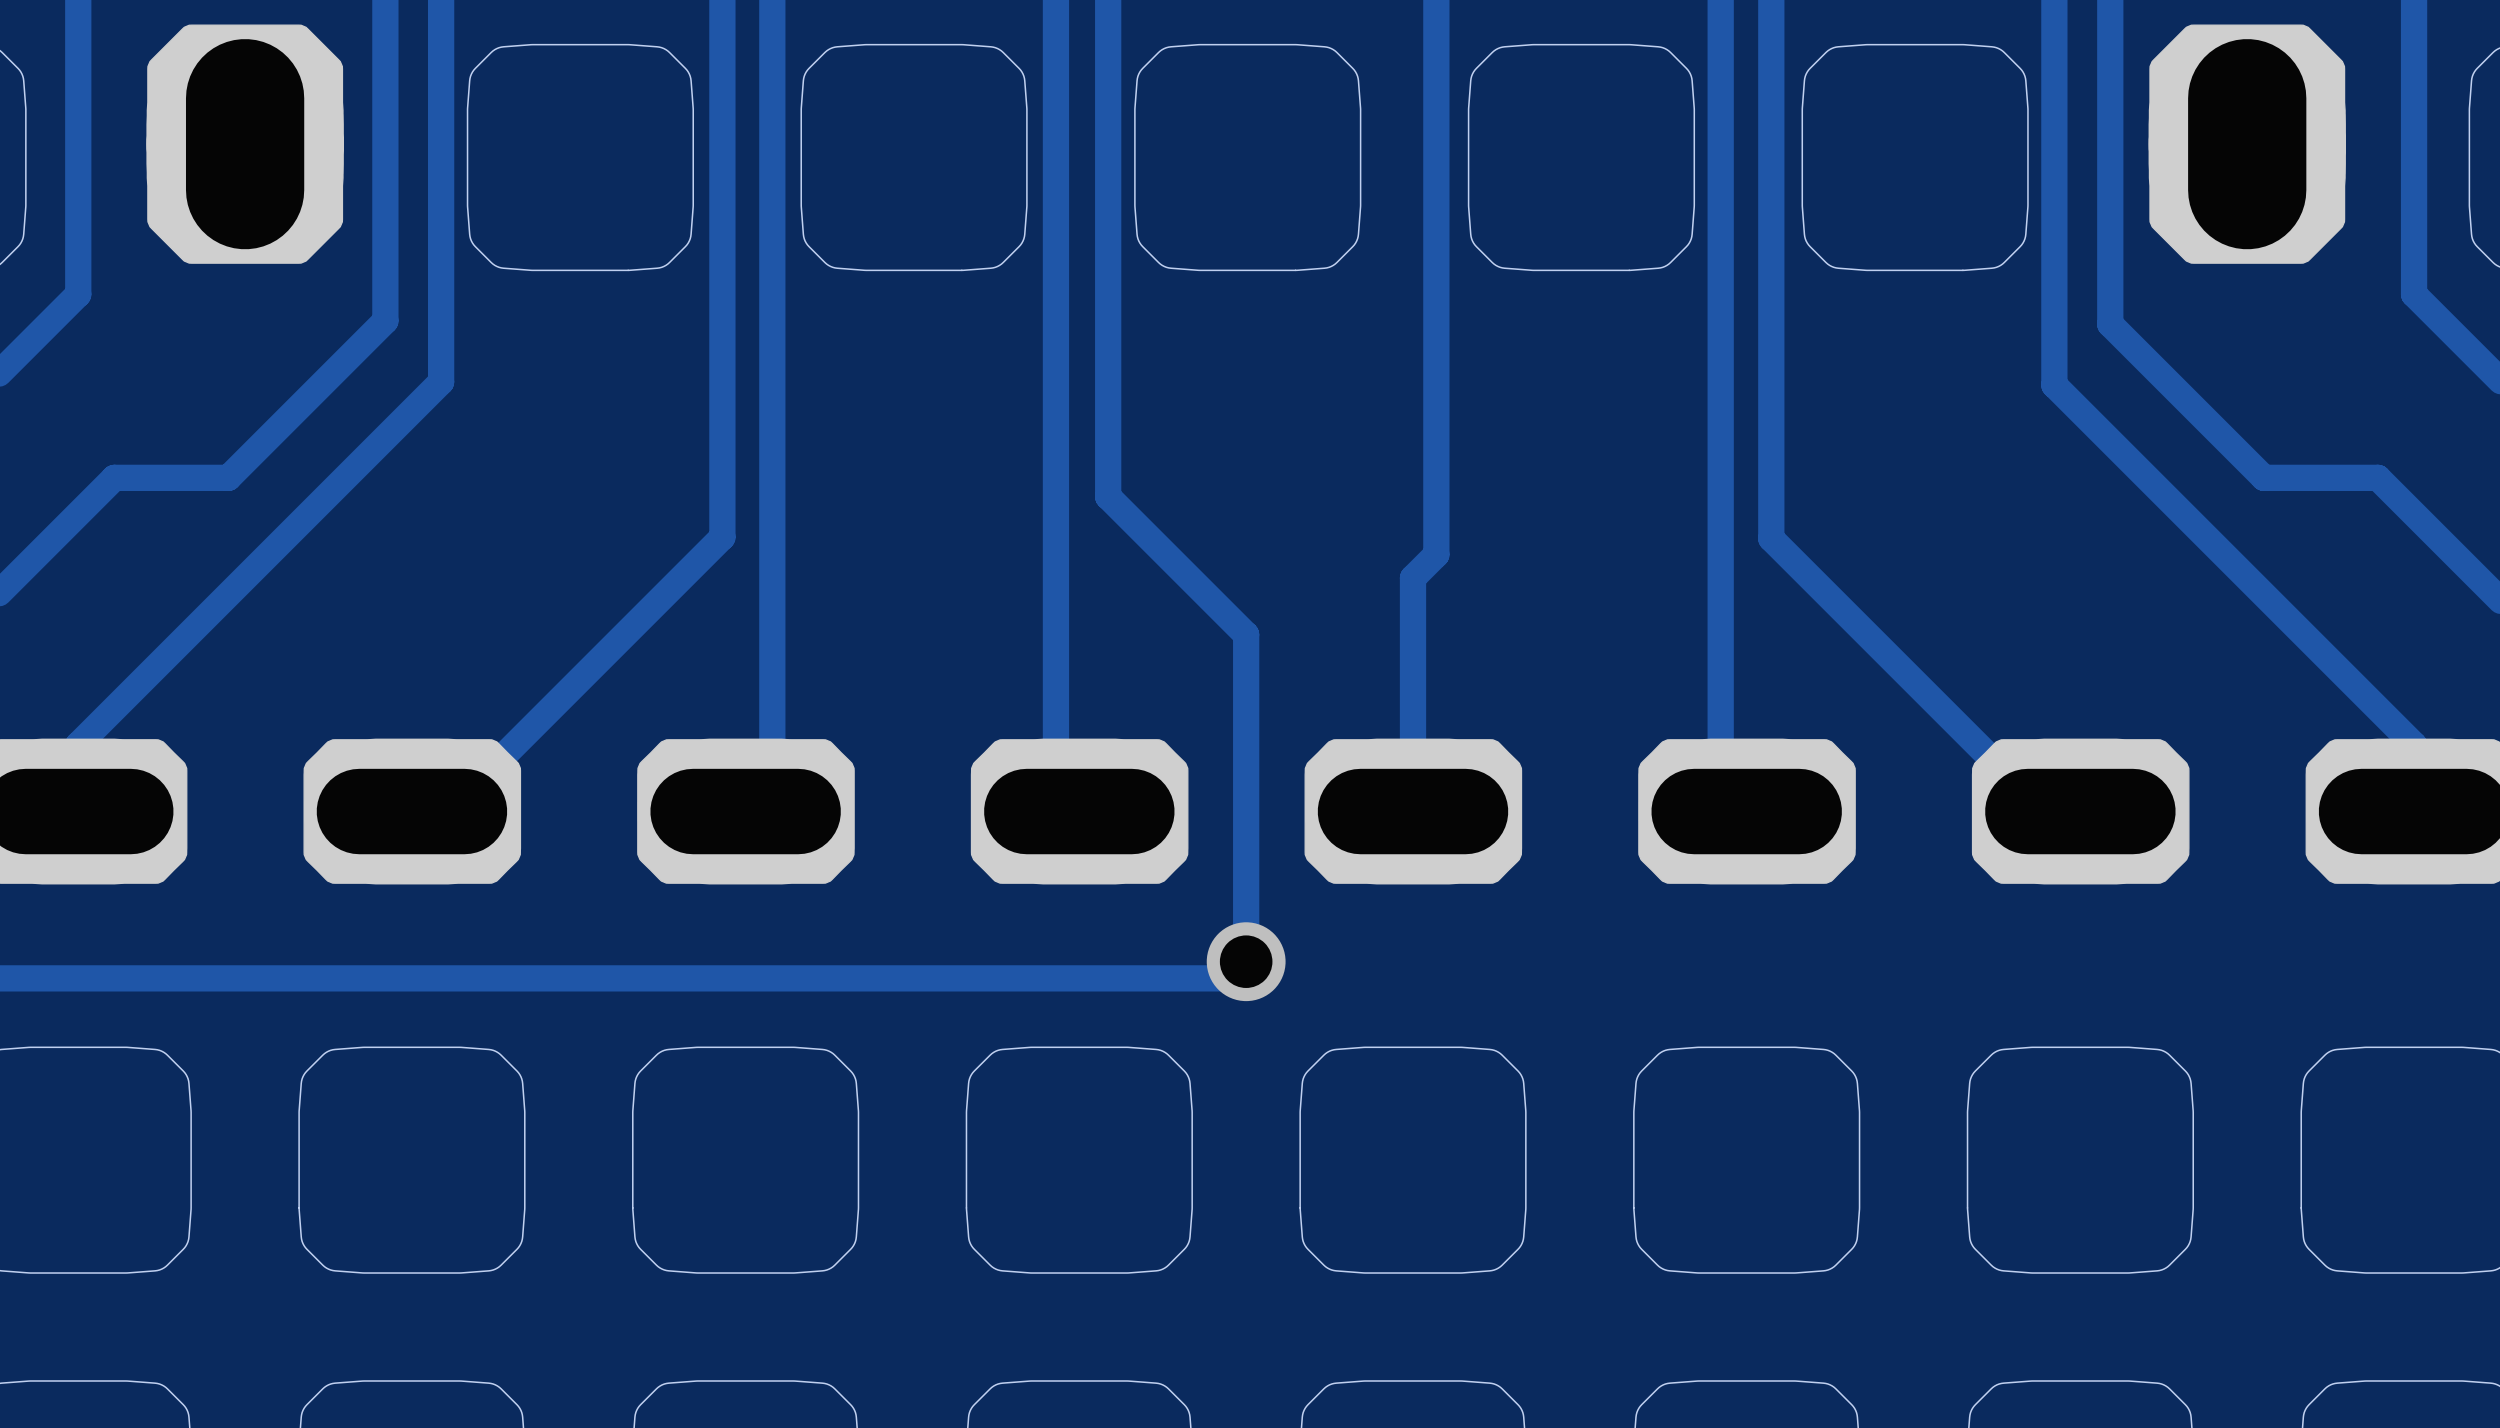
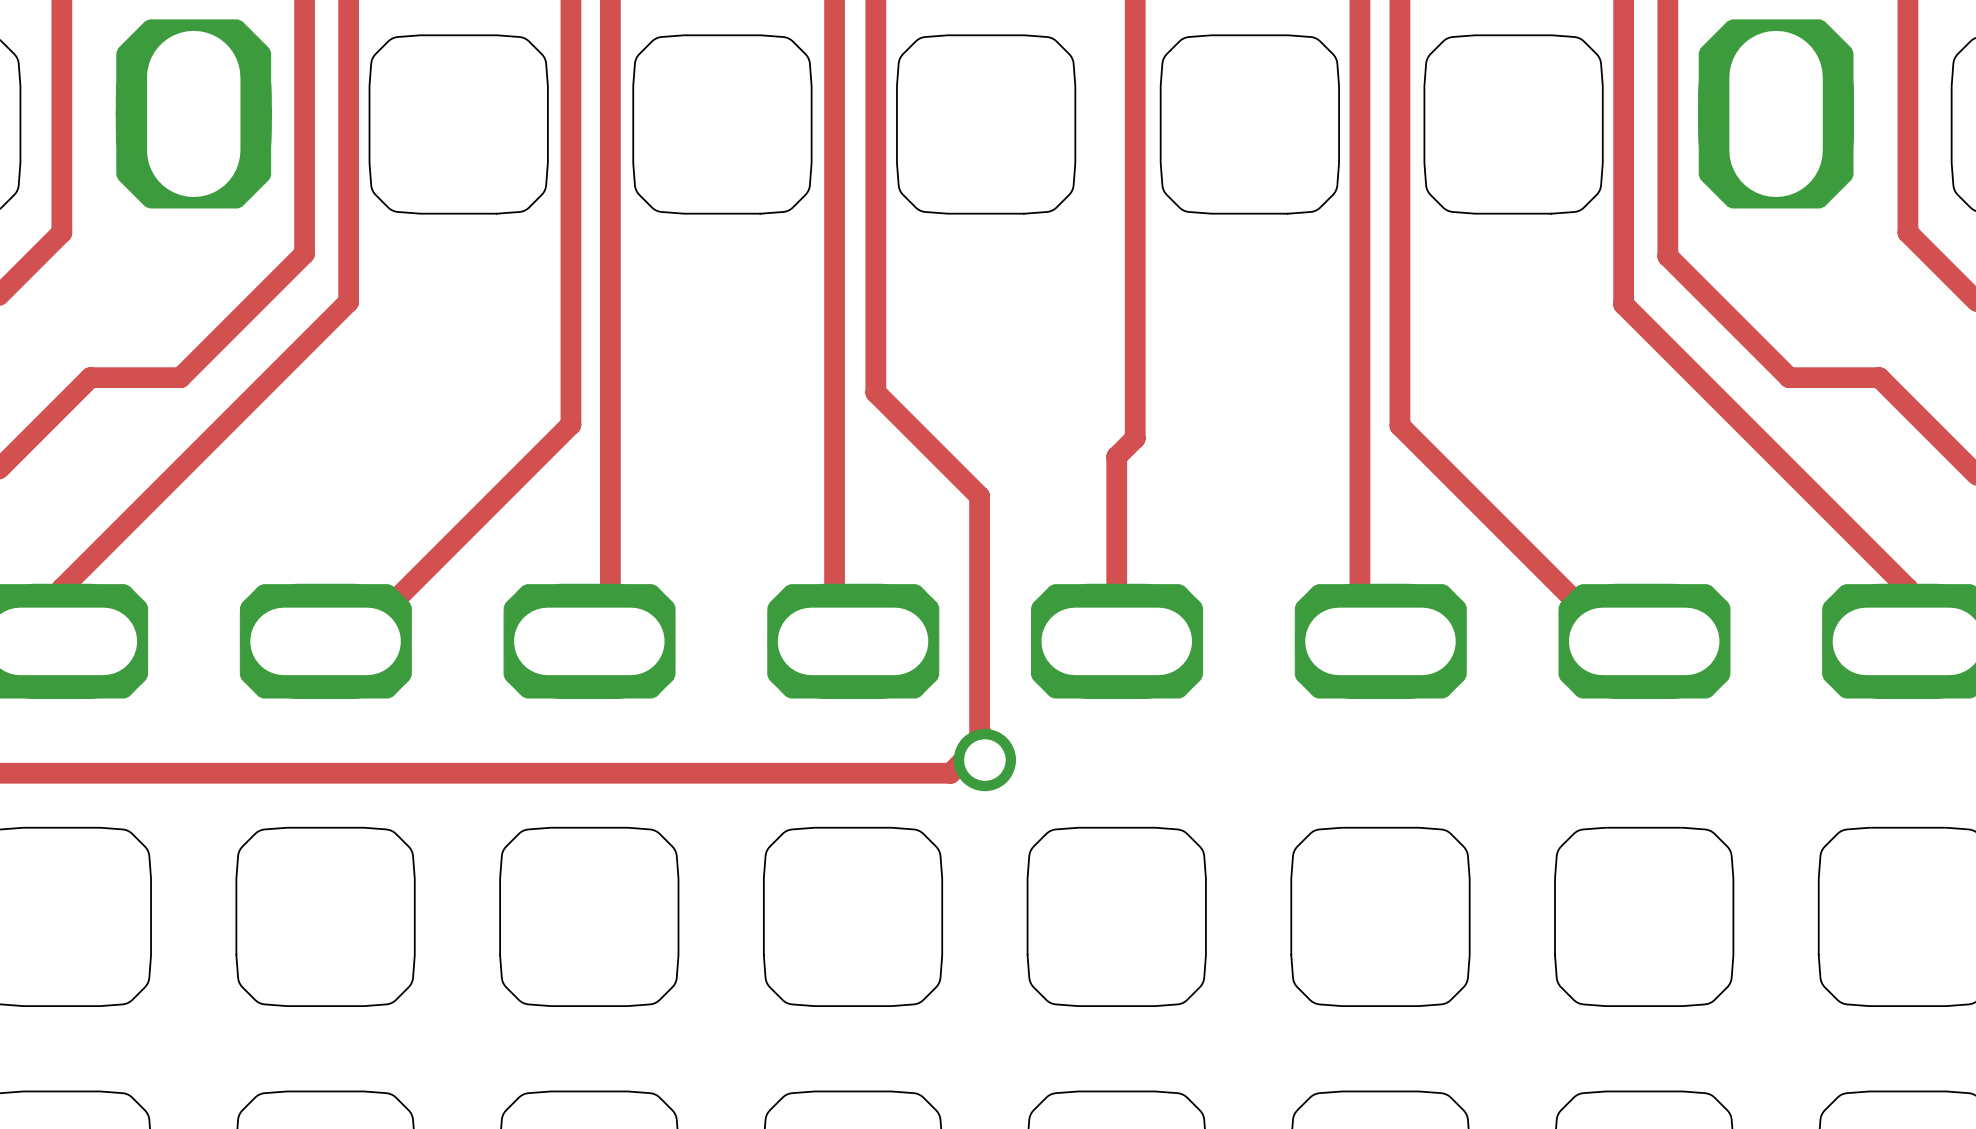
track: (1239, 628) (1246, 634) (1246, 961) (1229, 978) (1202, 978) -> (979, 496) (979, 744) (950, 773)

